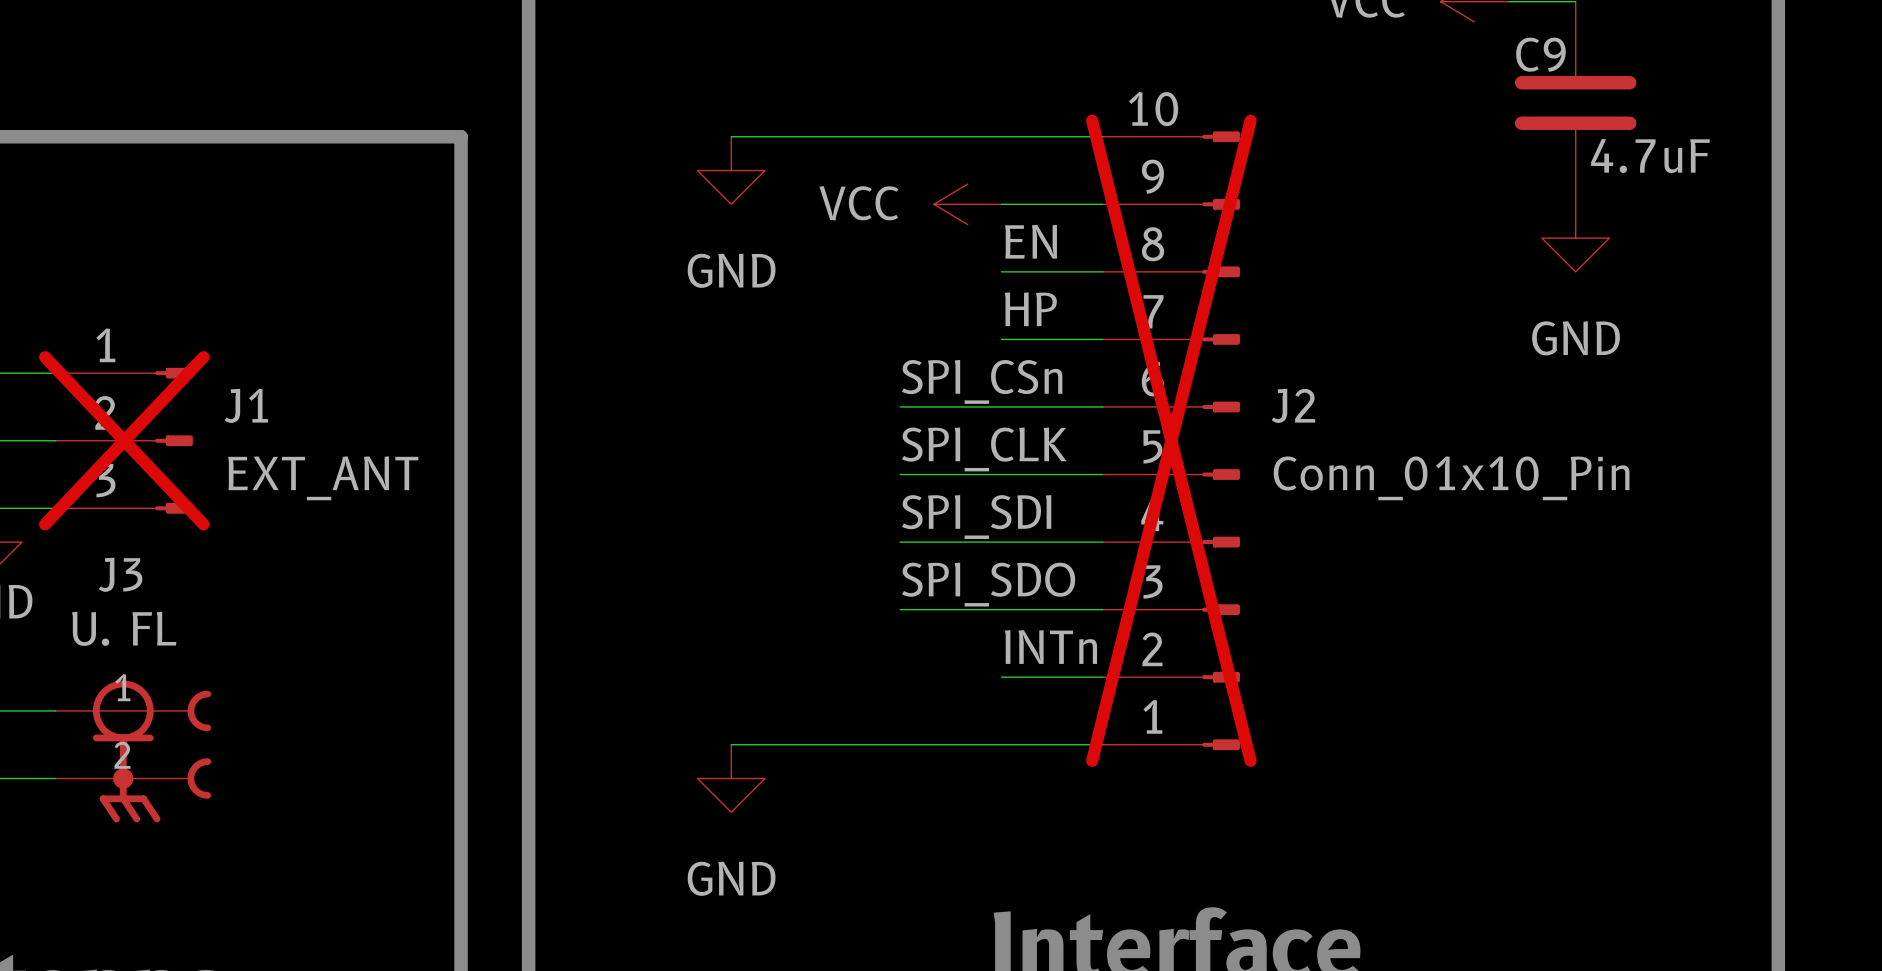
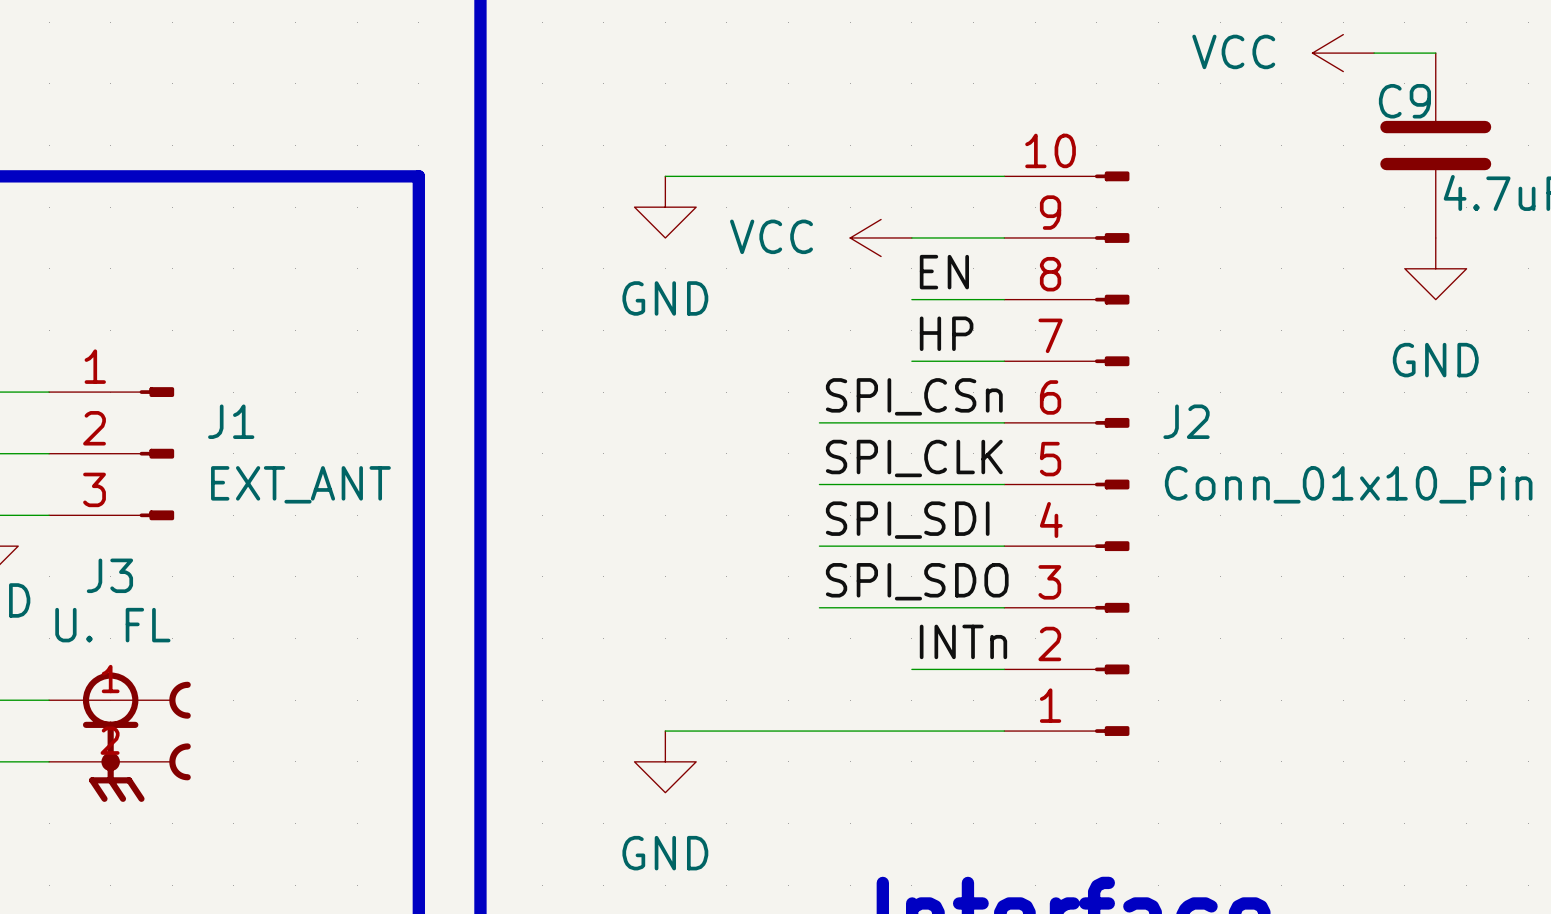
J1 do-not-place cross: (124, 440) -> none
J2 do-not-place cross: (1171, 440) -> none

